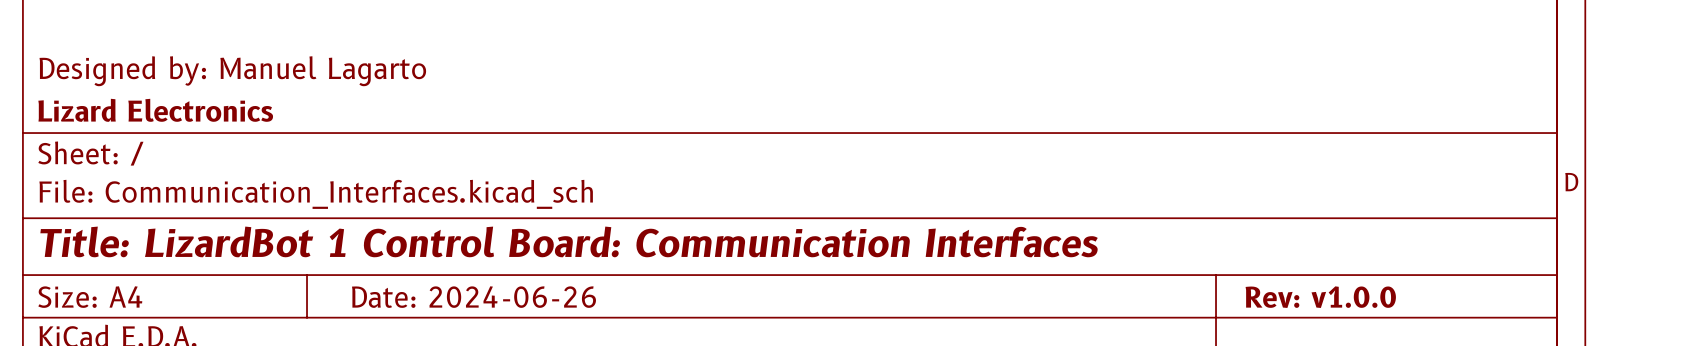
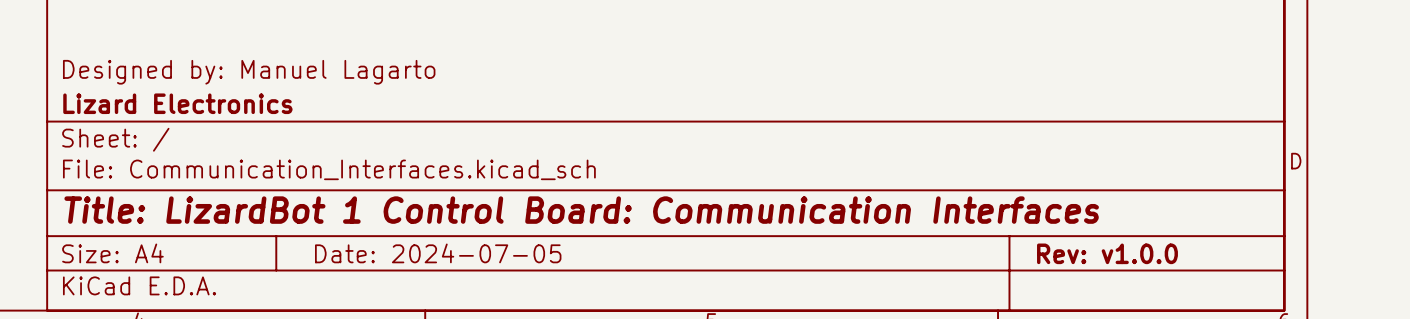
title block: Date: 2024-06-26 (473, 297) -> Date: 2024-07-05 (438, 253)

